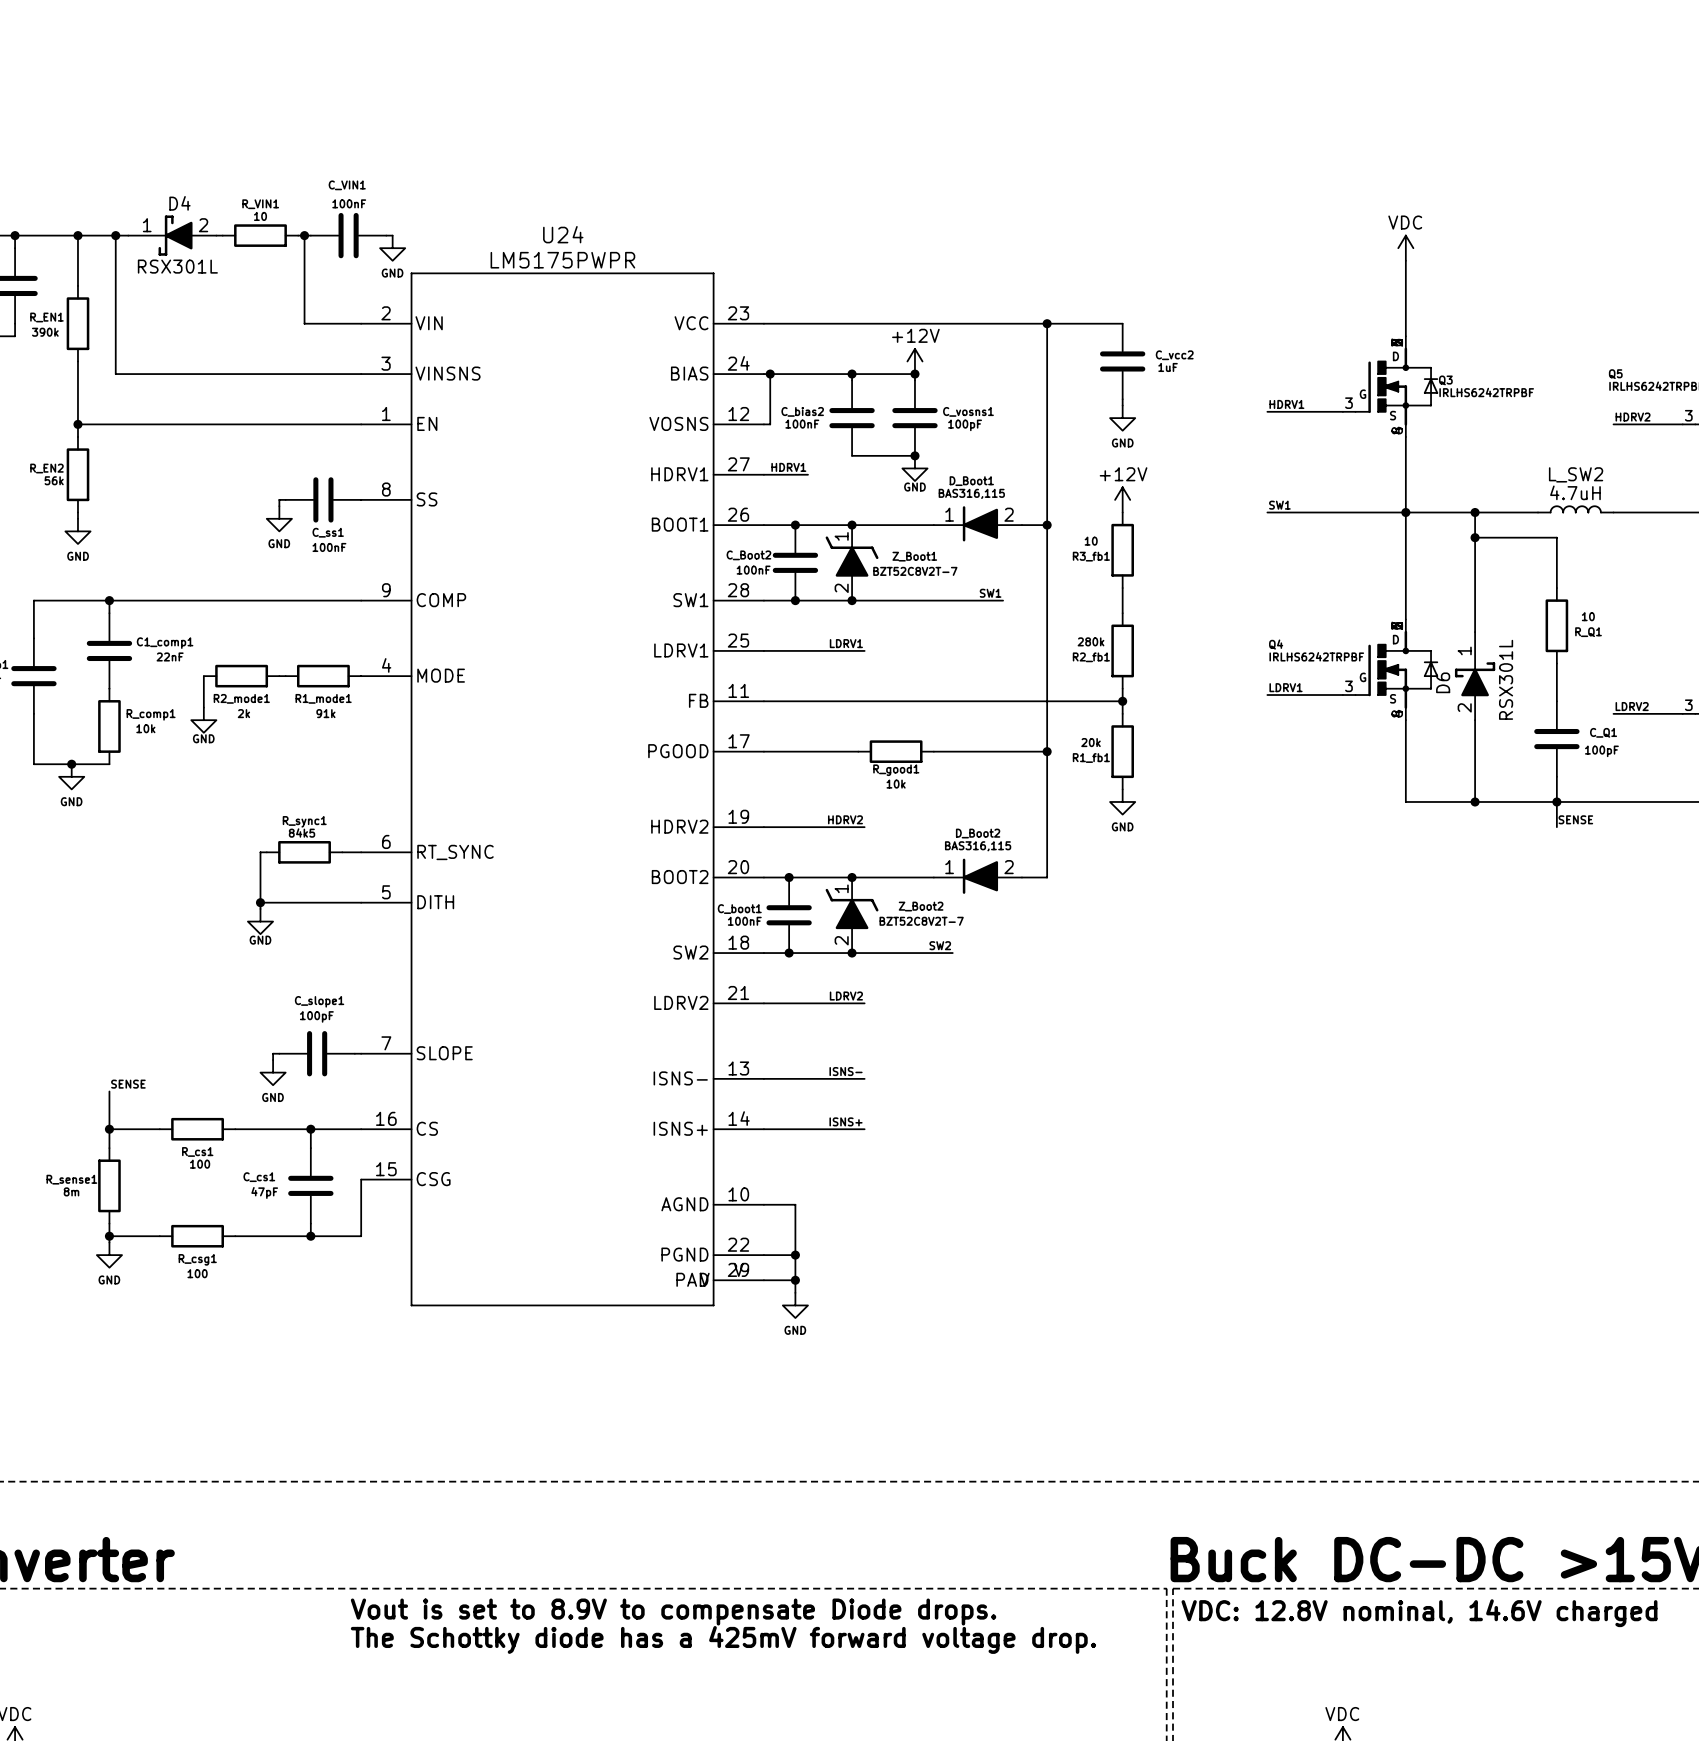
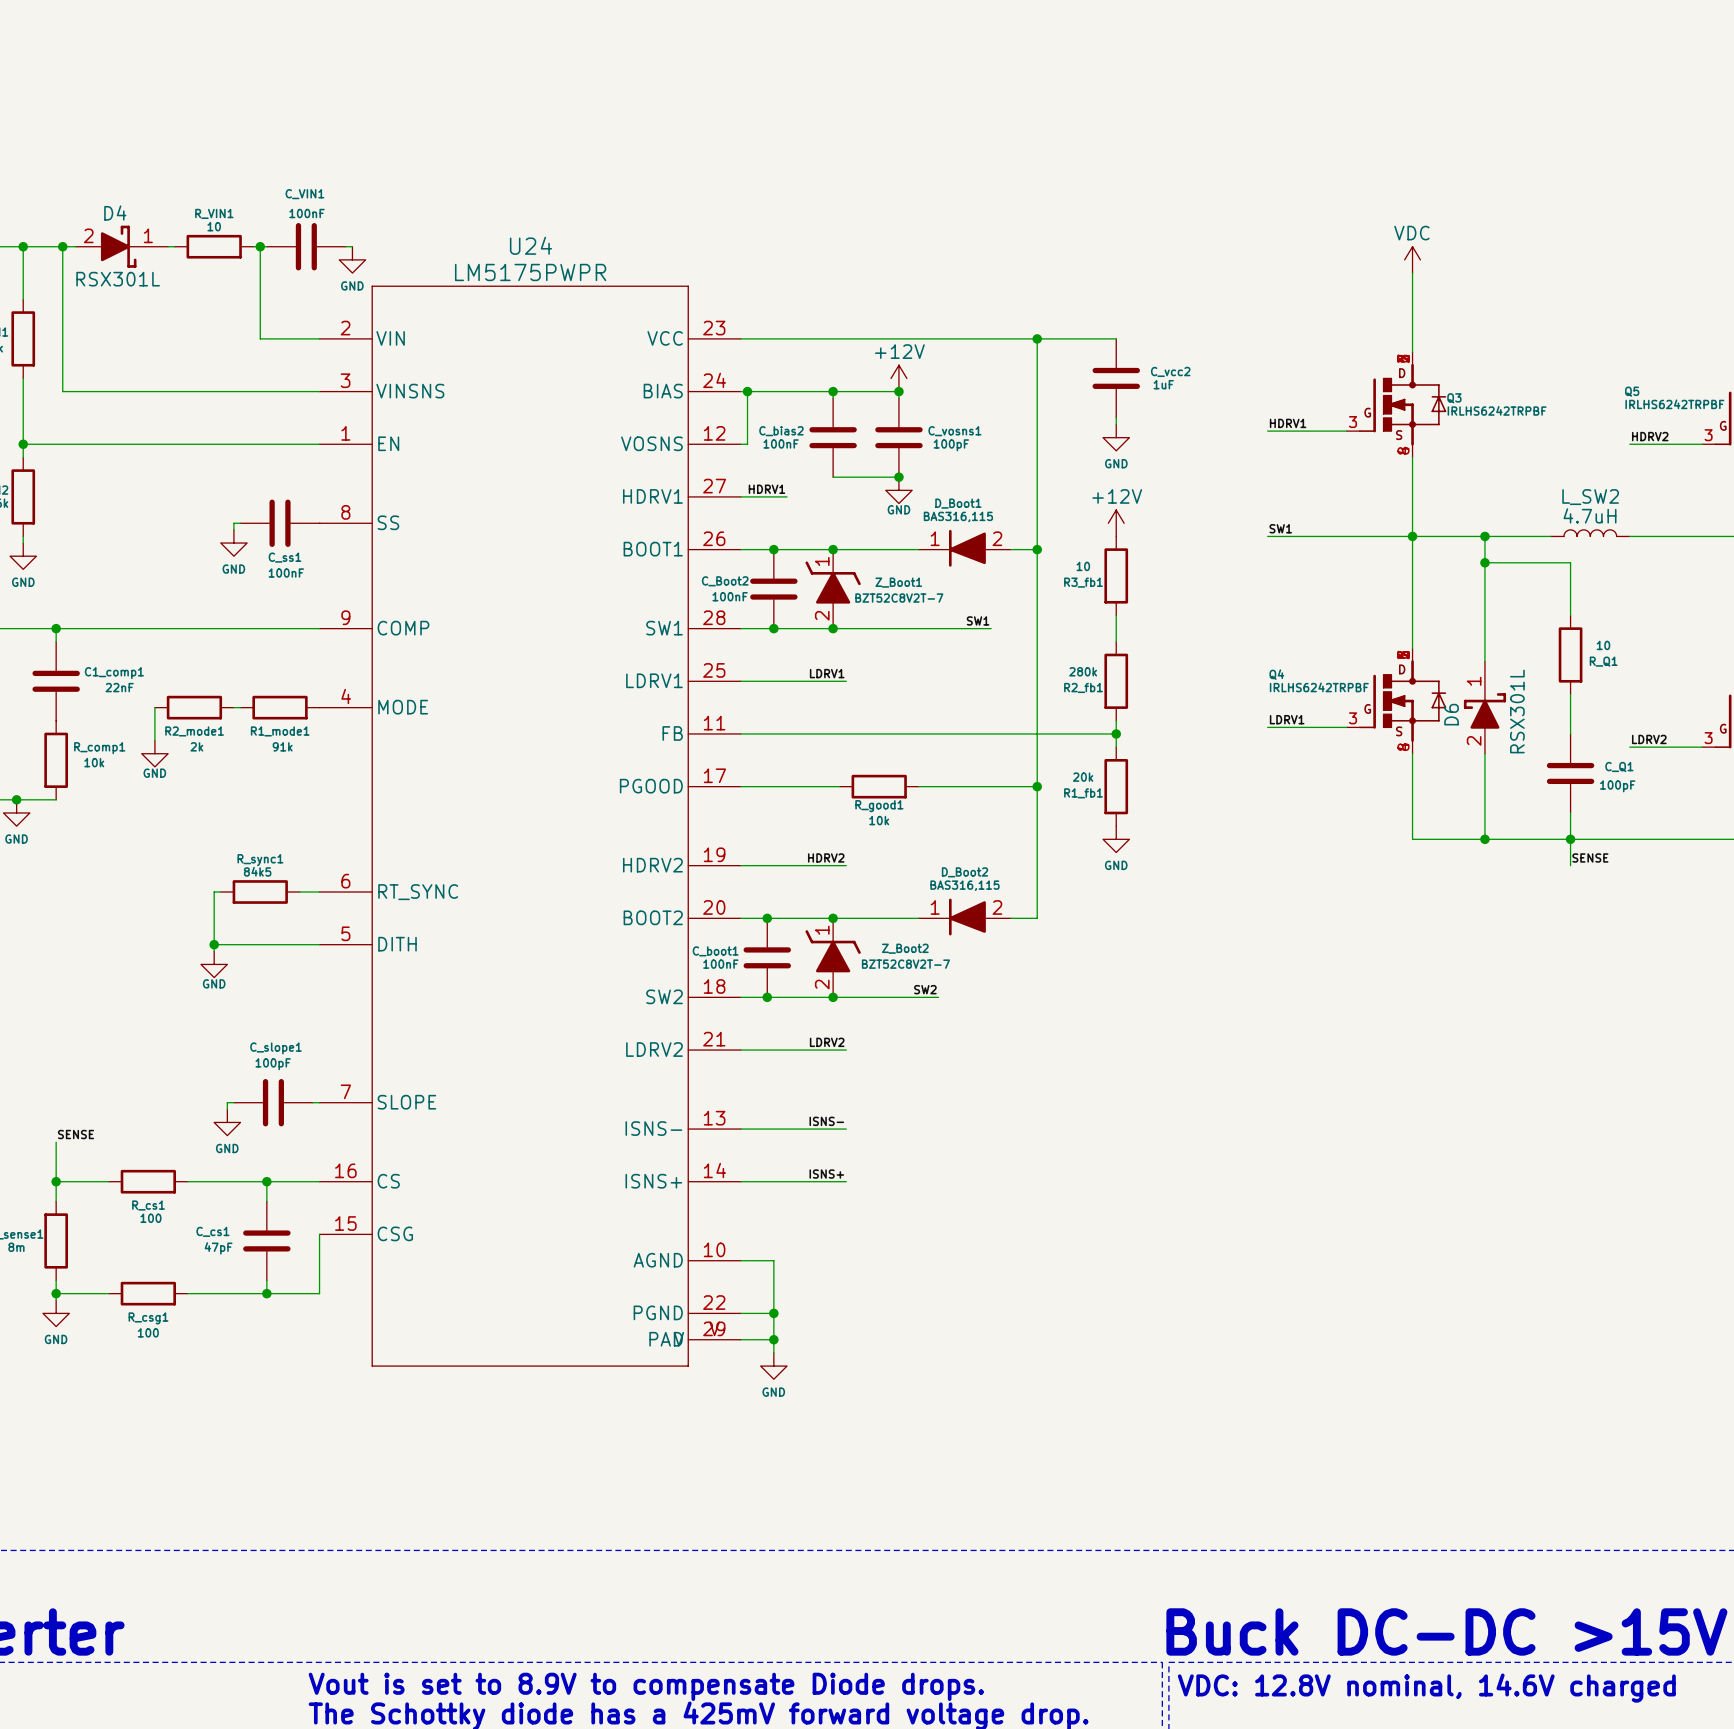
D4 flip: as is (175, 235) -> left-right (118, 246)

